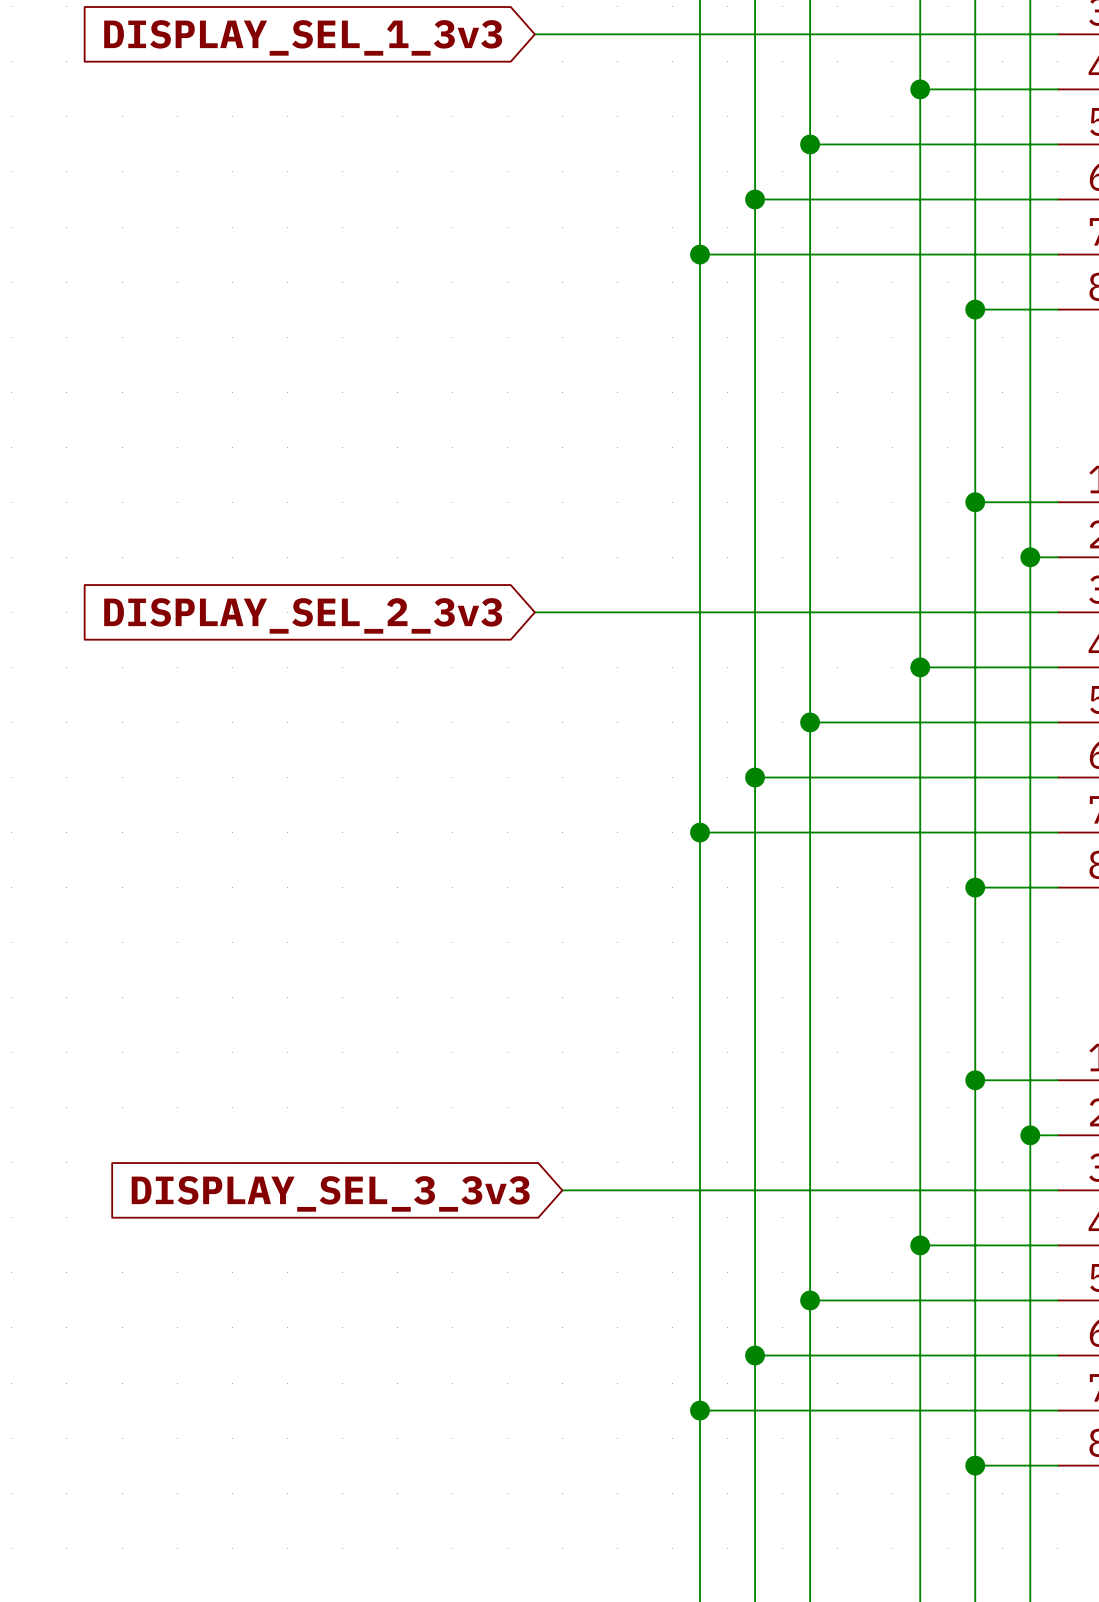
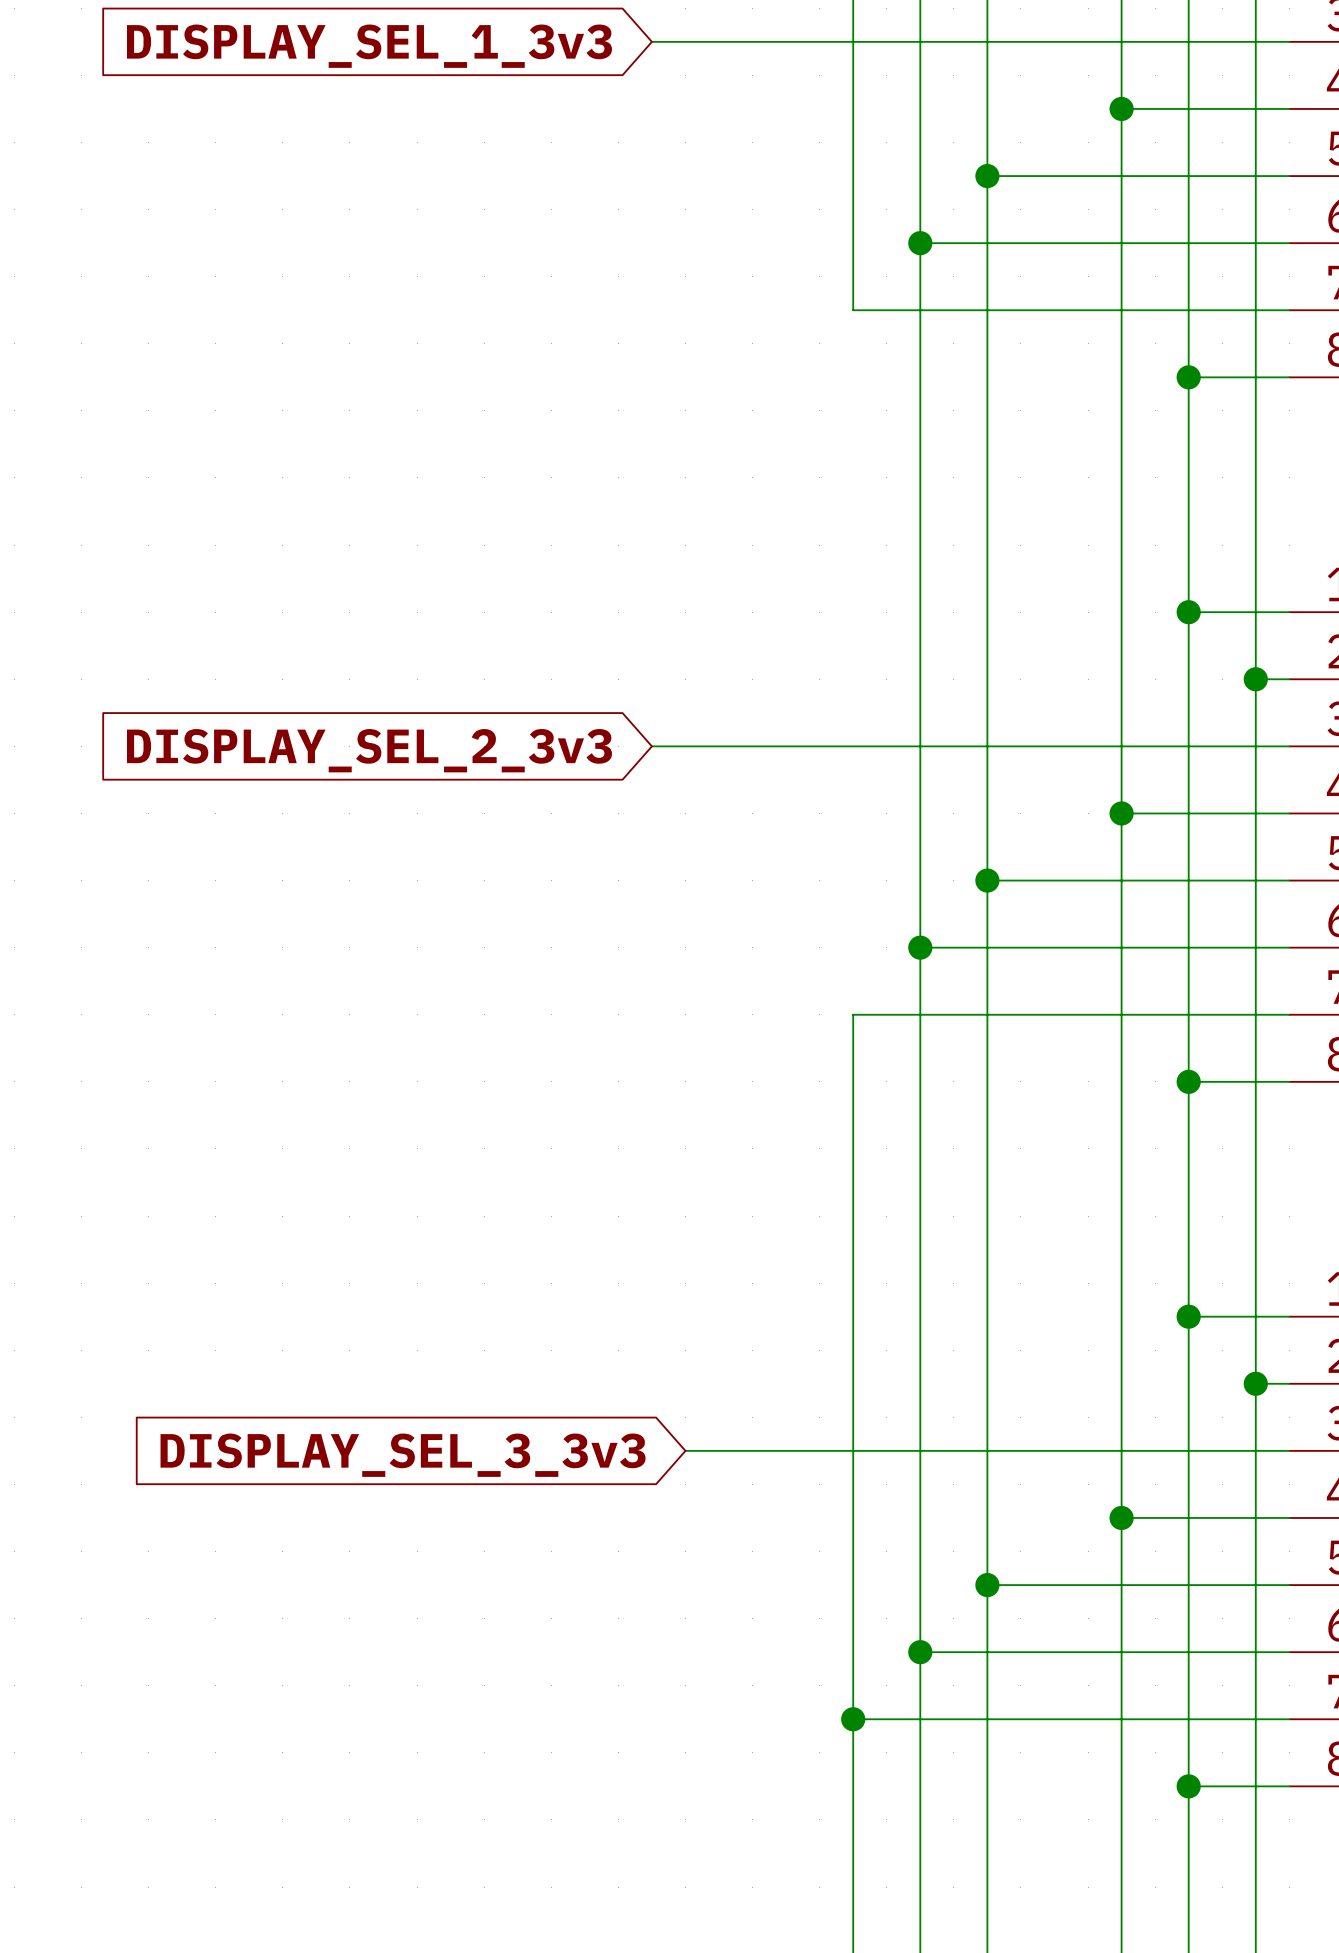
wire: (700, 254) (700, 832) -> none
junction: (700, 254) -> none
junction: (700, 832) -> none

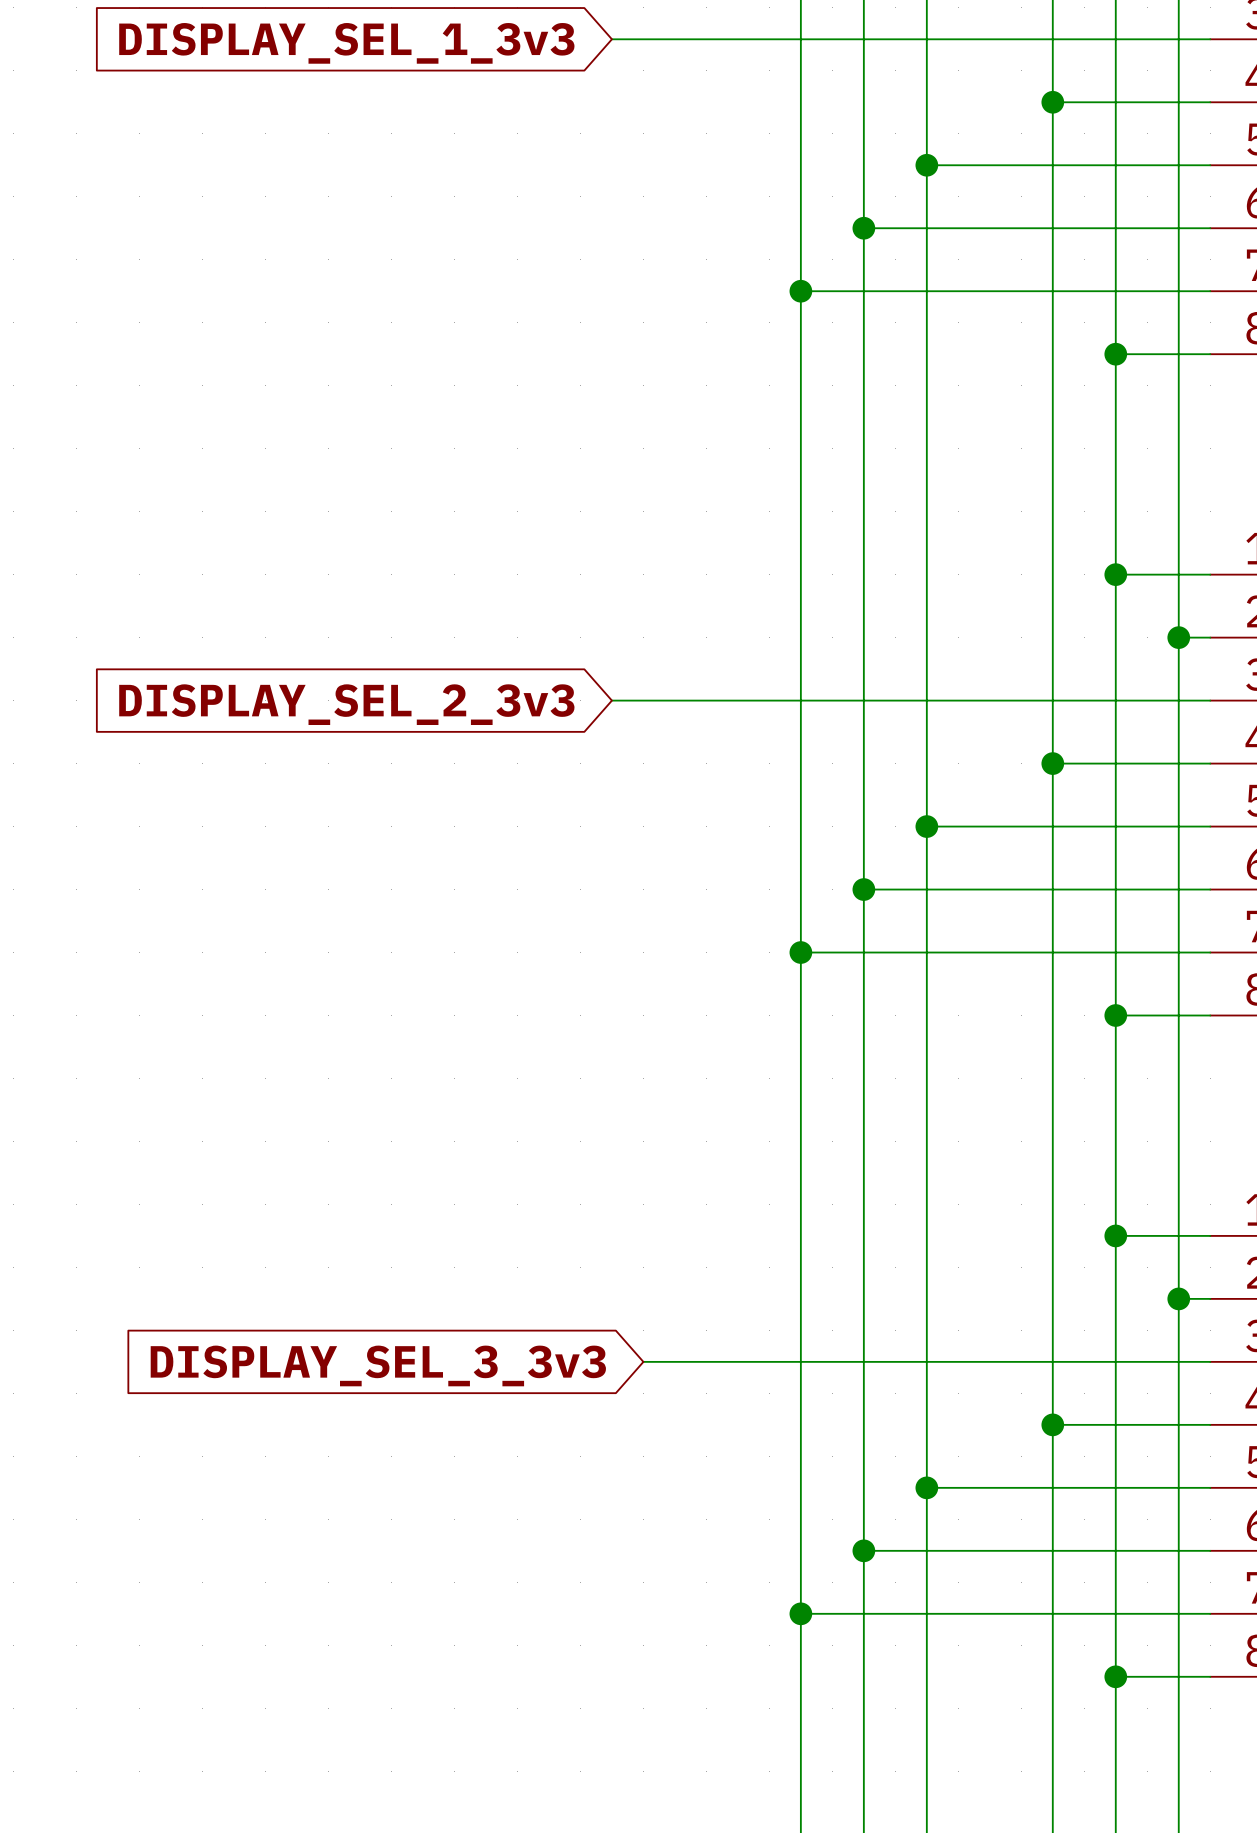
wire: none -> (800, 291) (800, 952)
junction: none -> (800, 291)
junction: none -> (800, 952)

